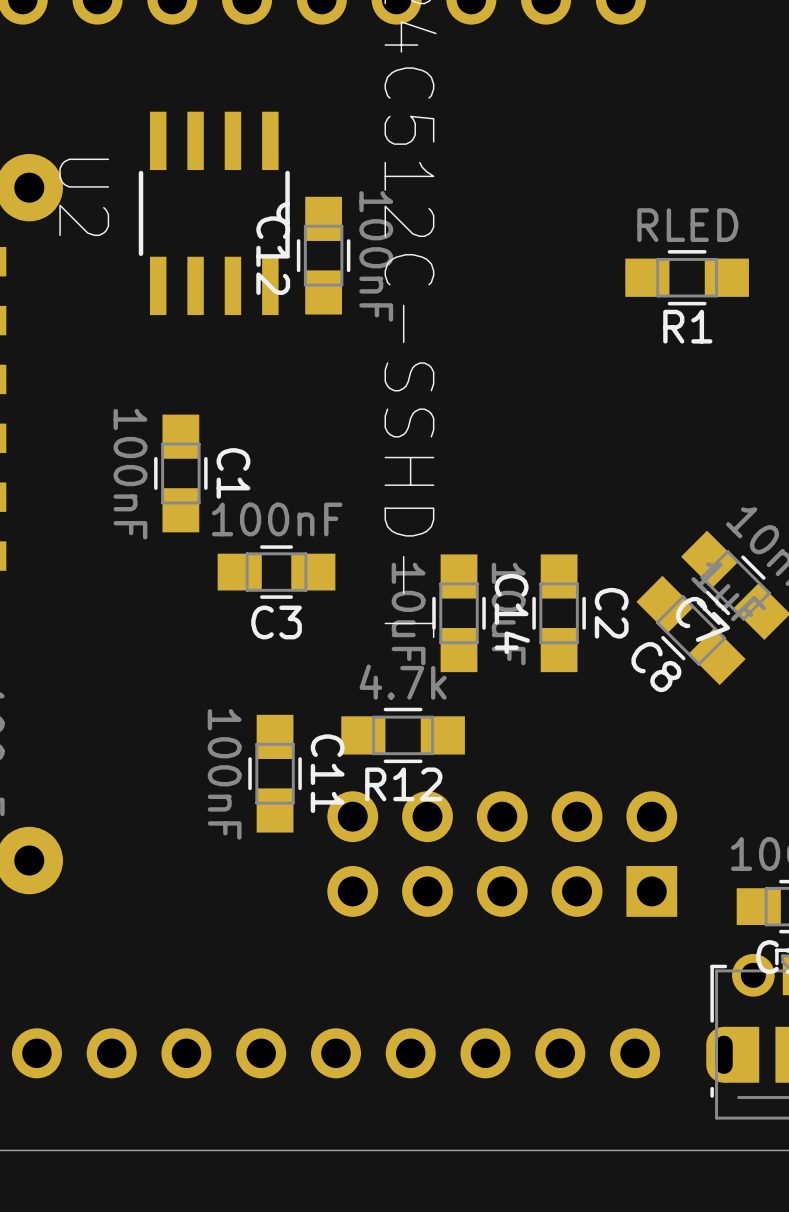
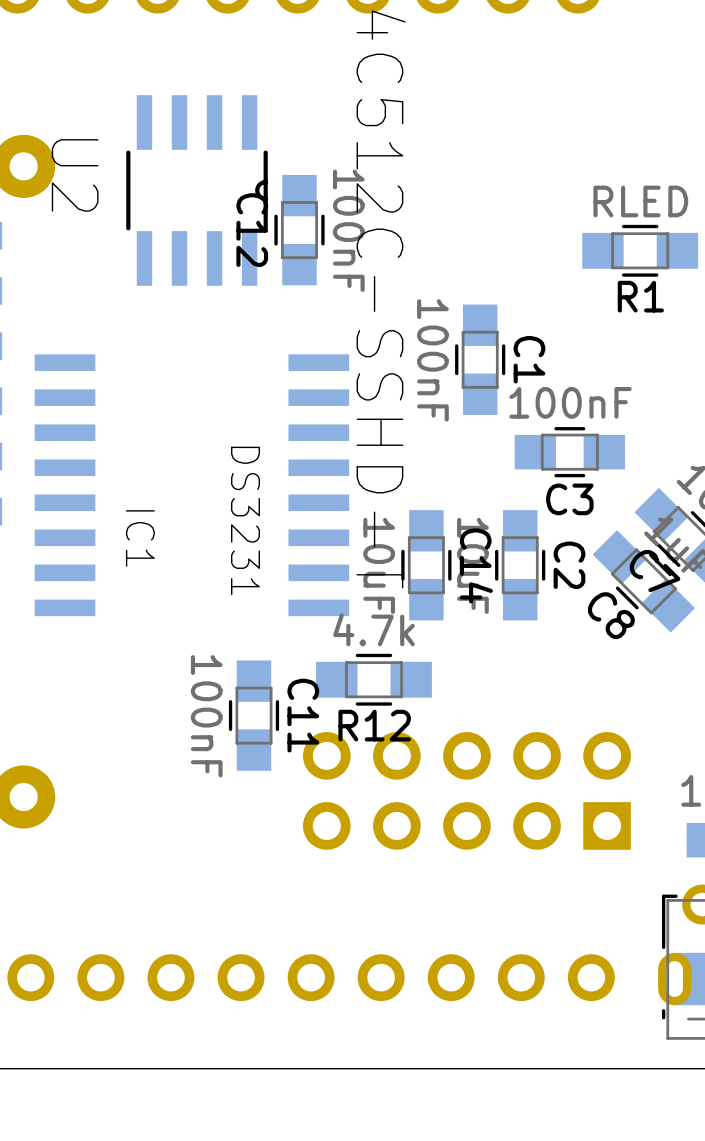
C1 position: (180, 473) -> (480, 359)
IC1: none -> DS3231 (191, 485)
C3 position: (276, 572) -> (569, 452)

